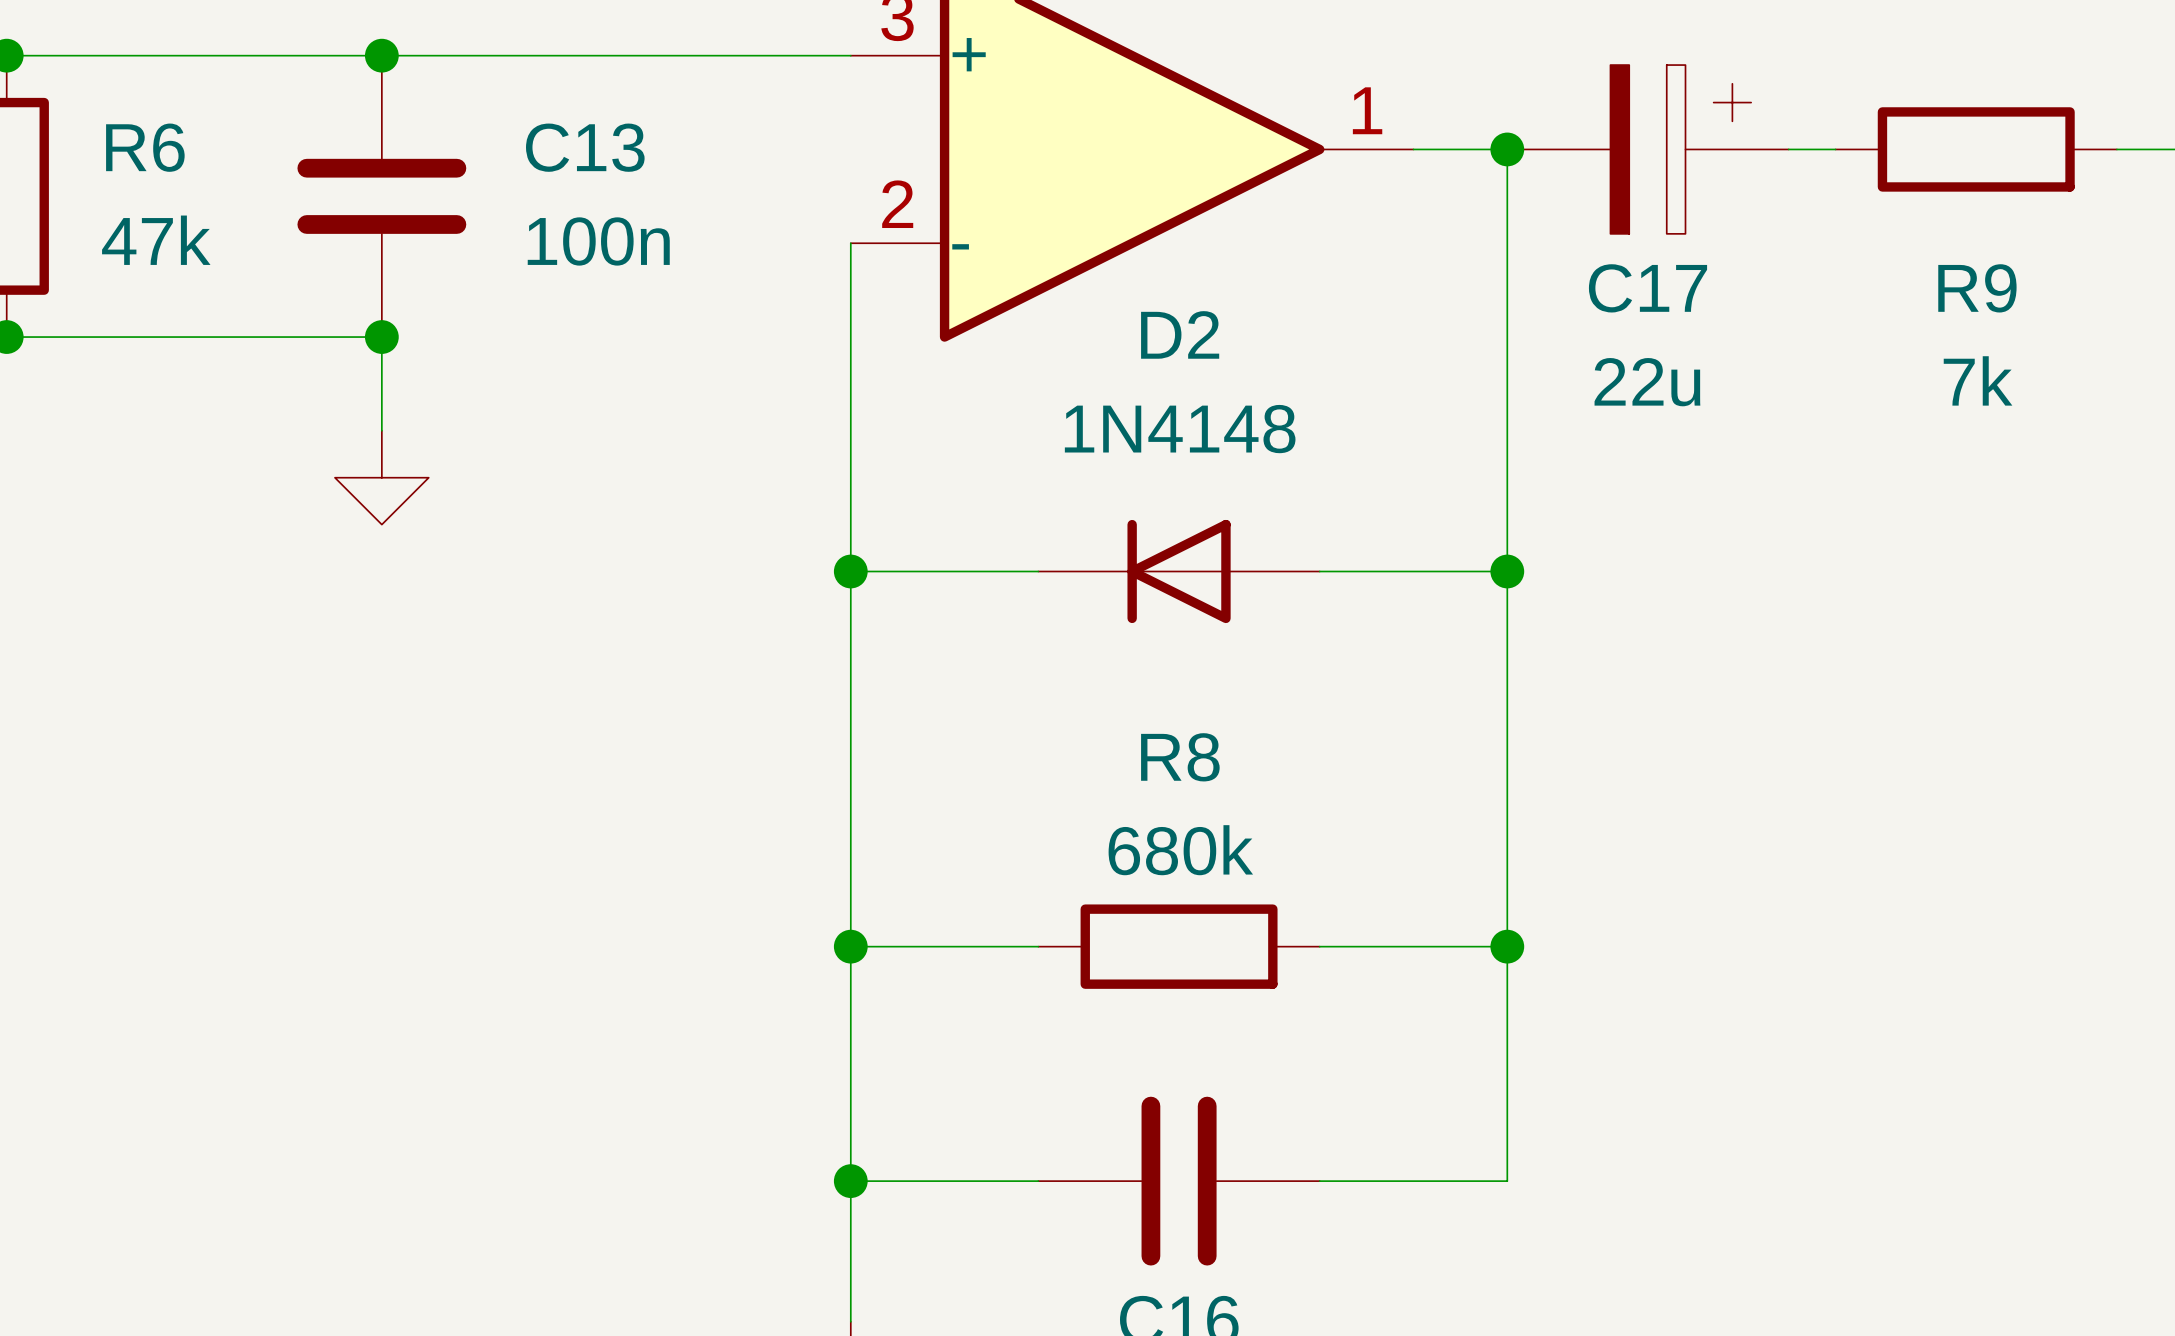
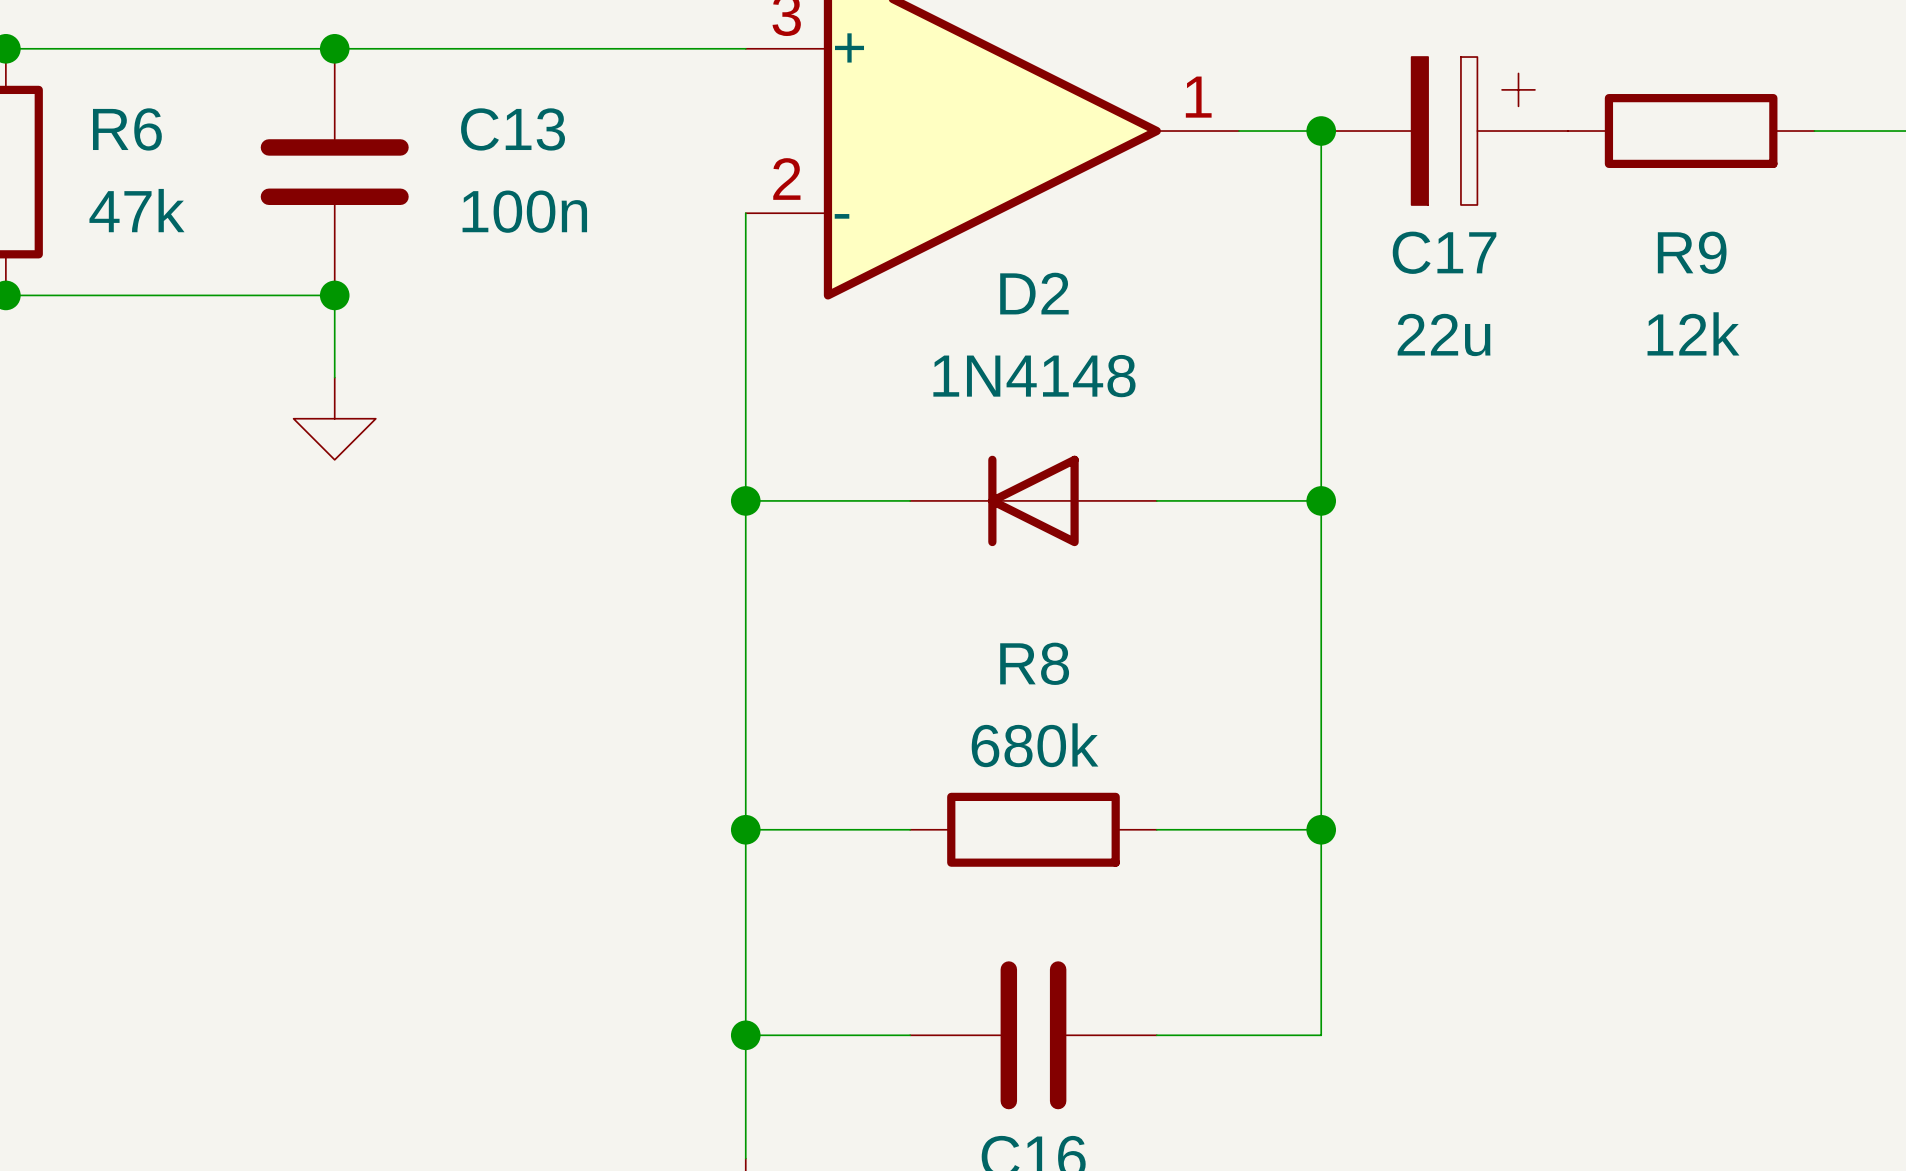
R9 position: (1976, 149) -> (1691, 131)
R9 value: 7k (1978, 380) -> 12k (1693, 333)

